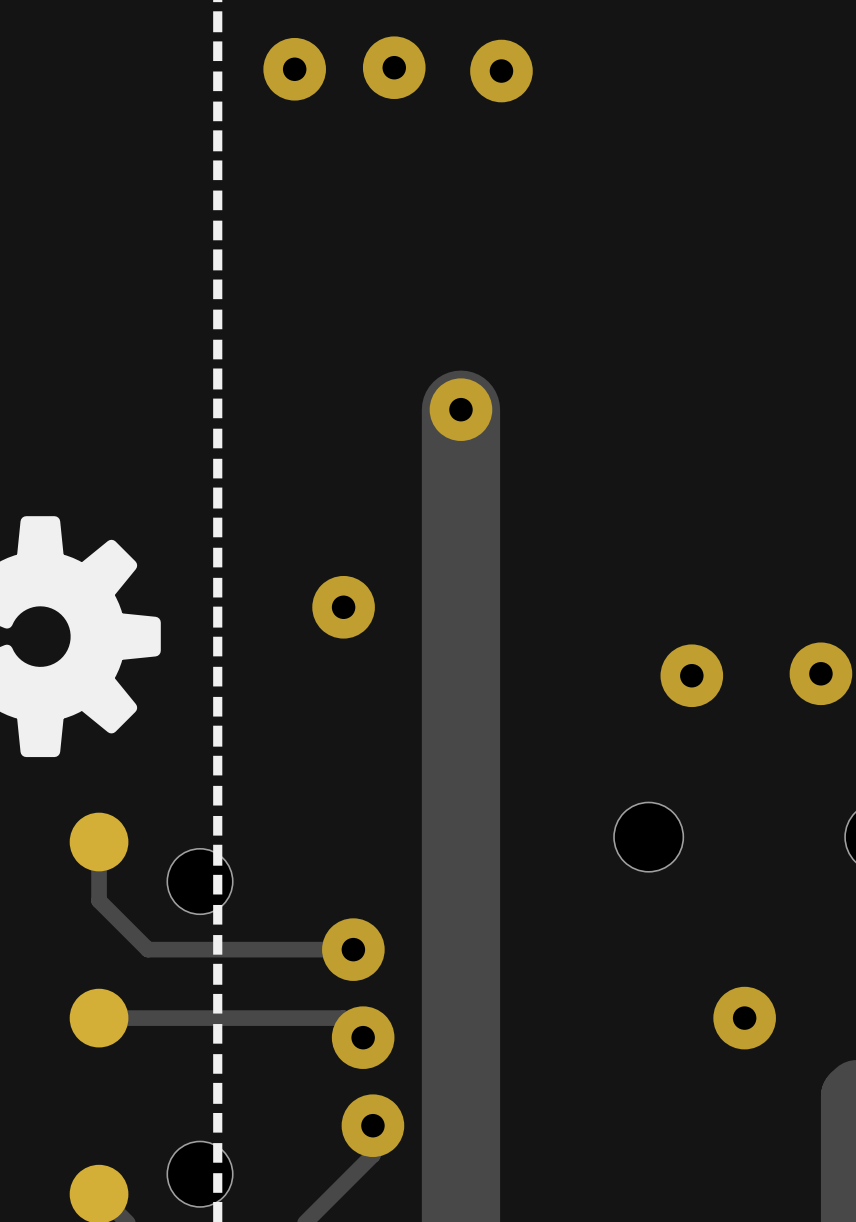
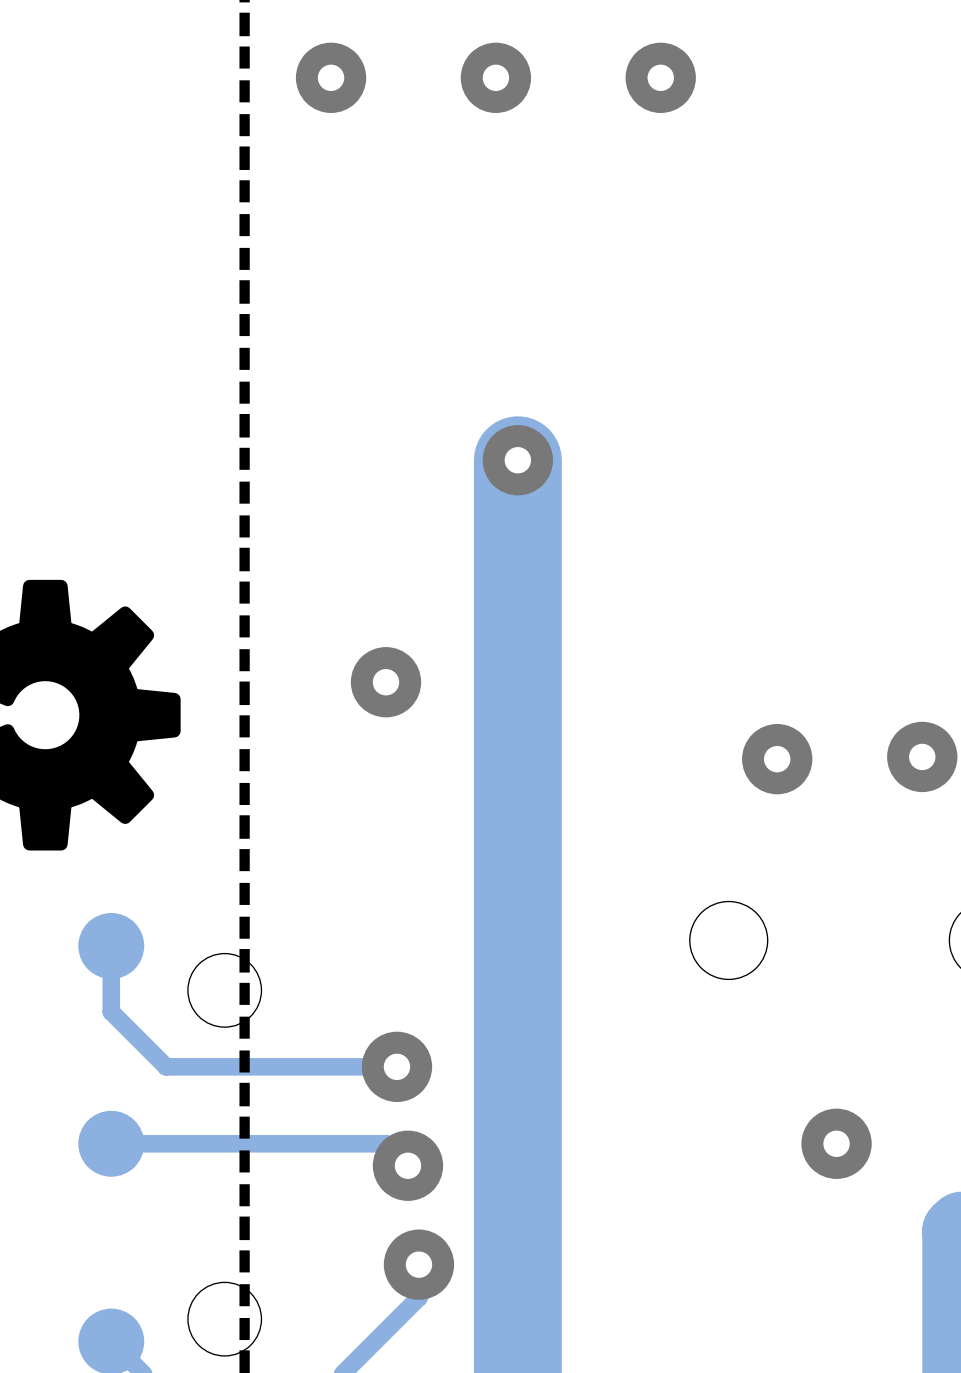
via: (394, 67) -> none
via: none -> (495, 77)
via: none -> (660, 77)
via: (501, 71) -> none

